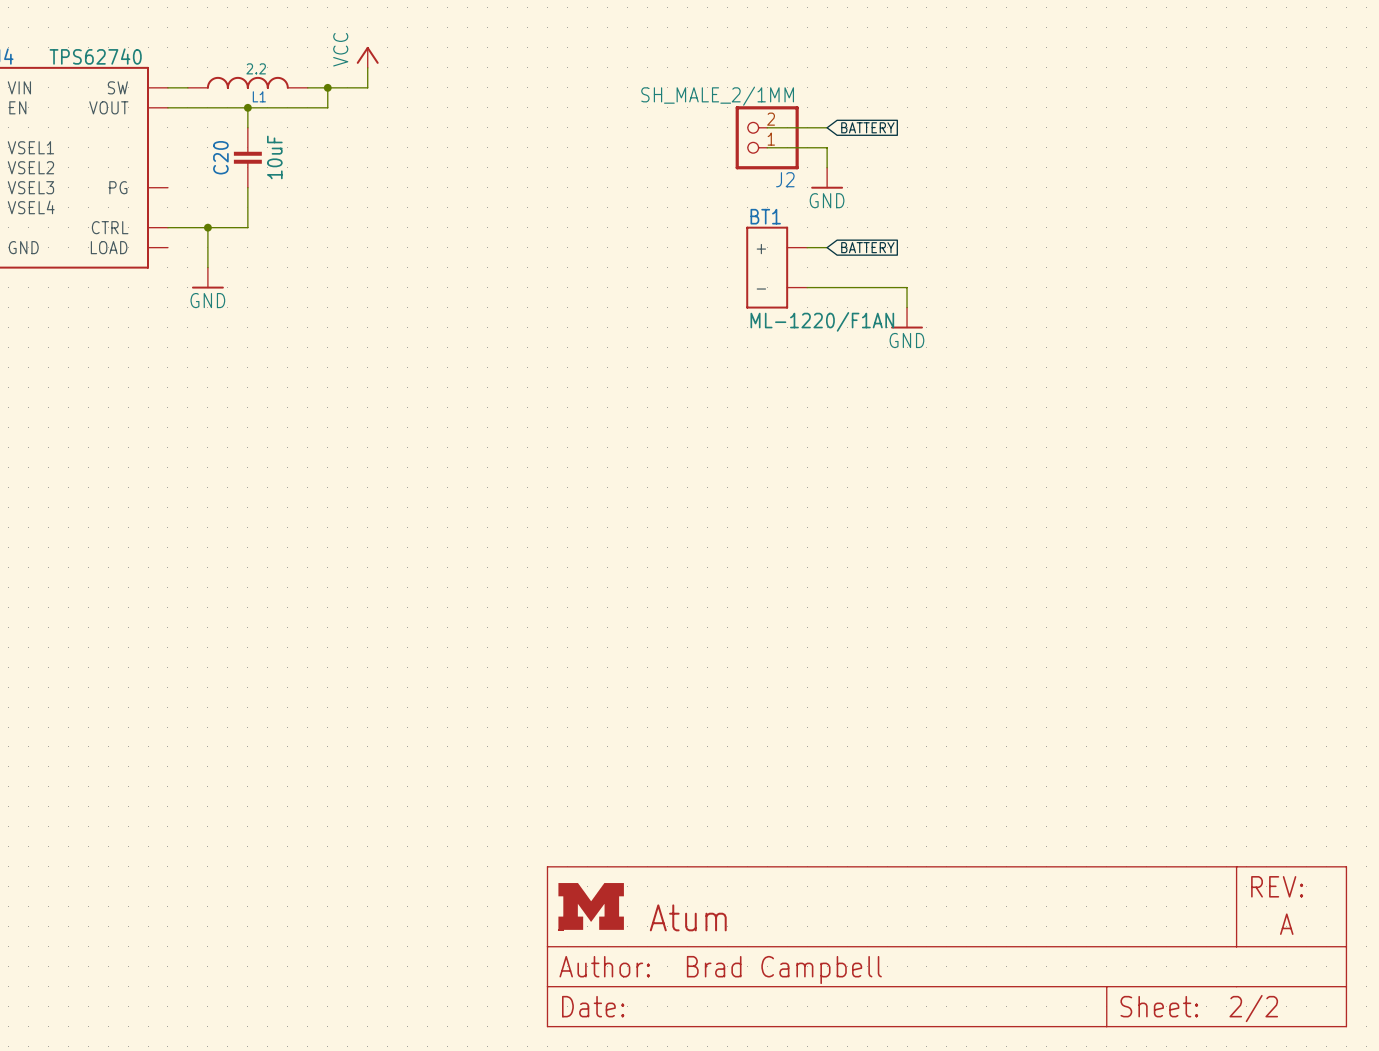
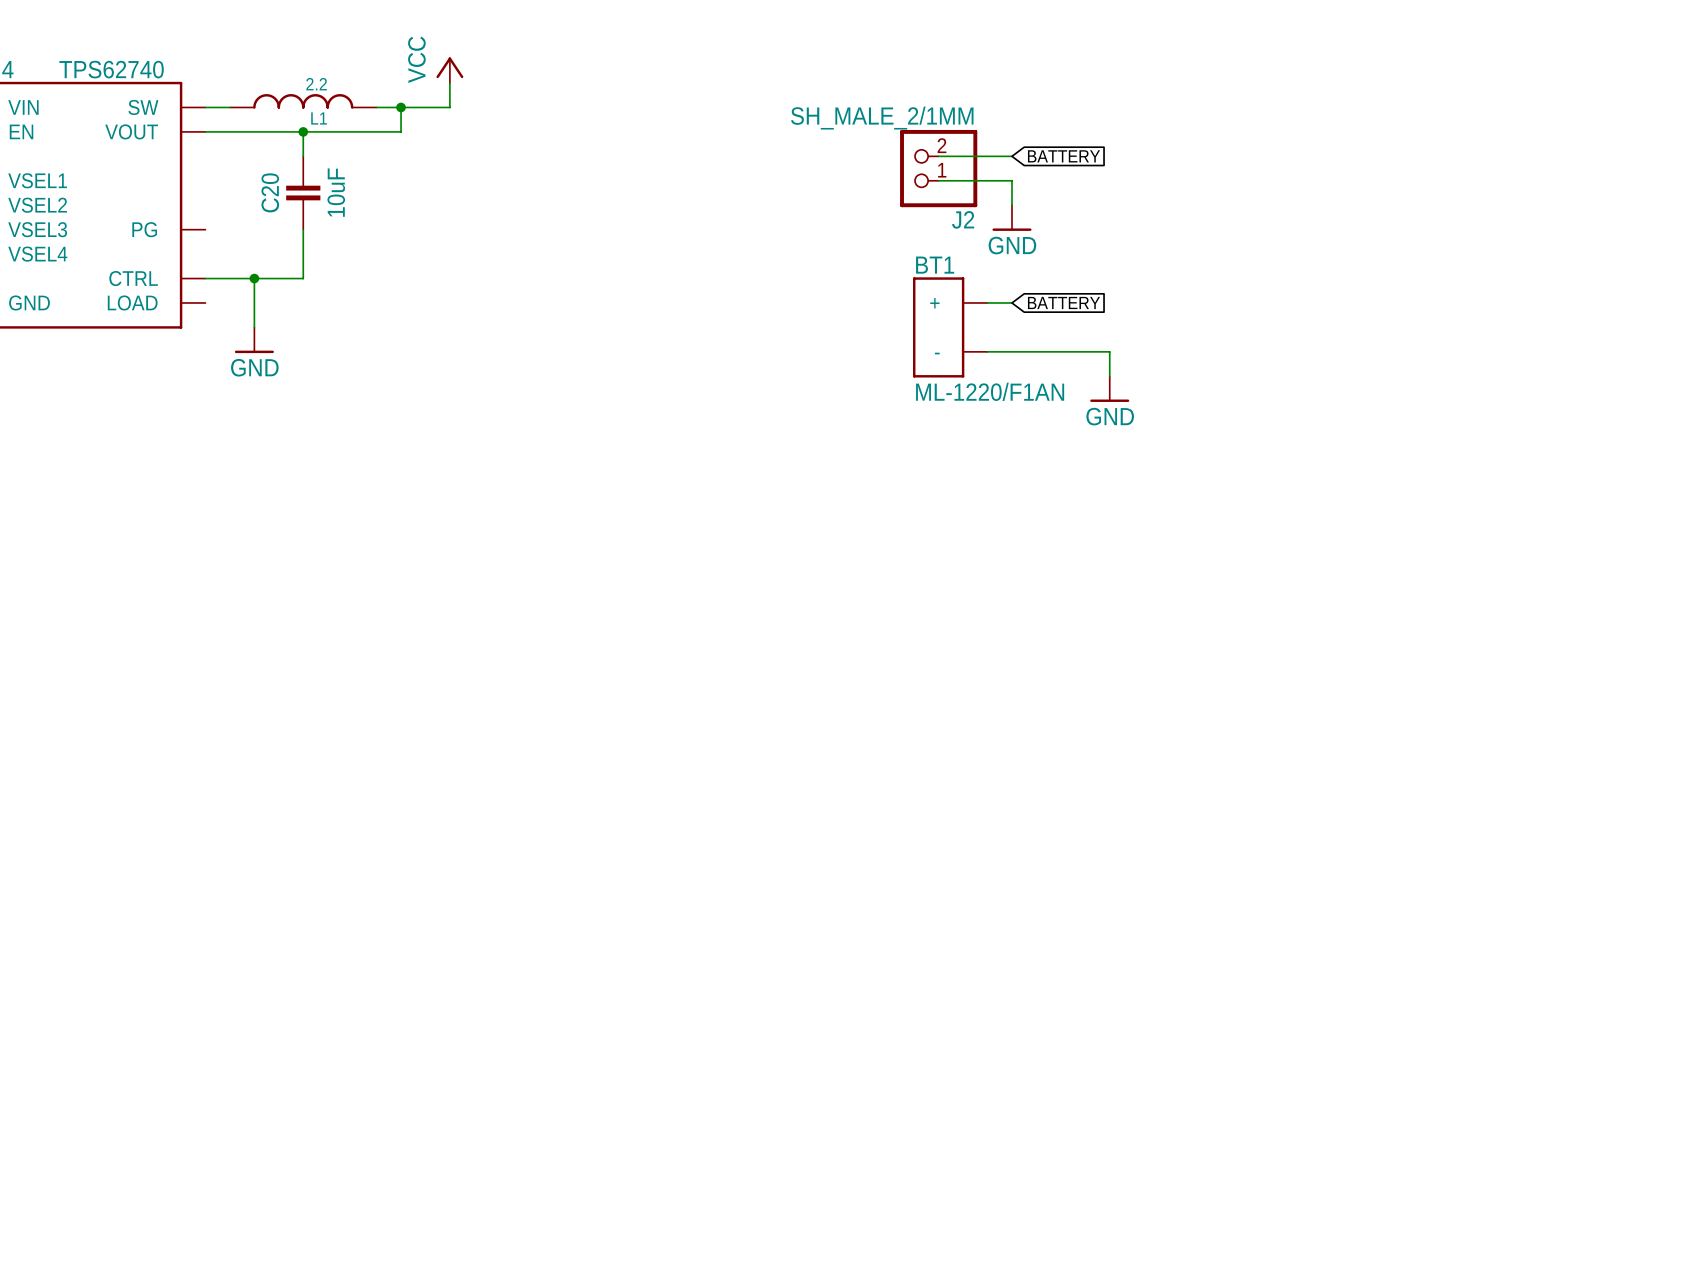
part: (946, 946) -> none

